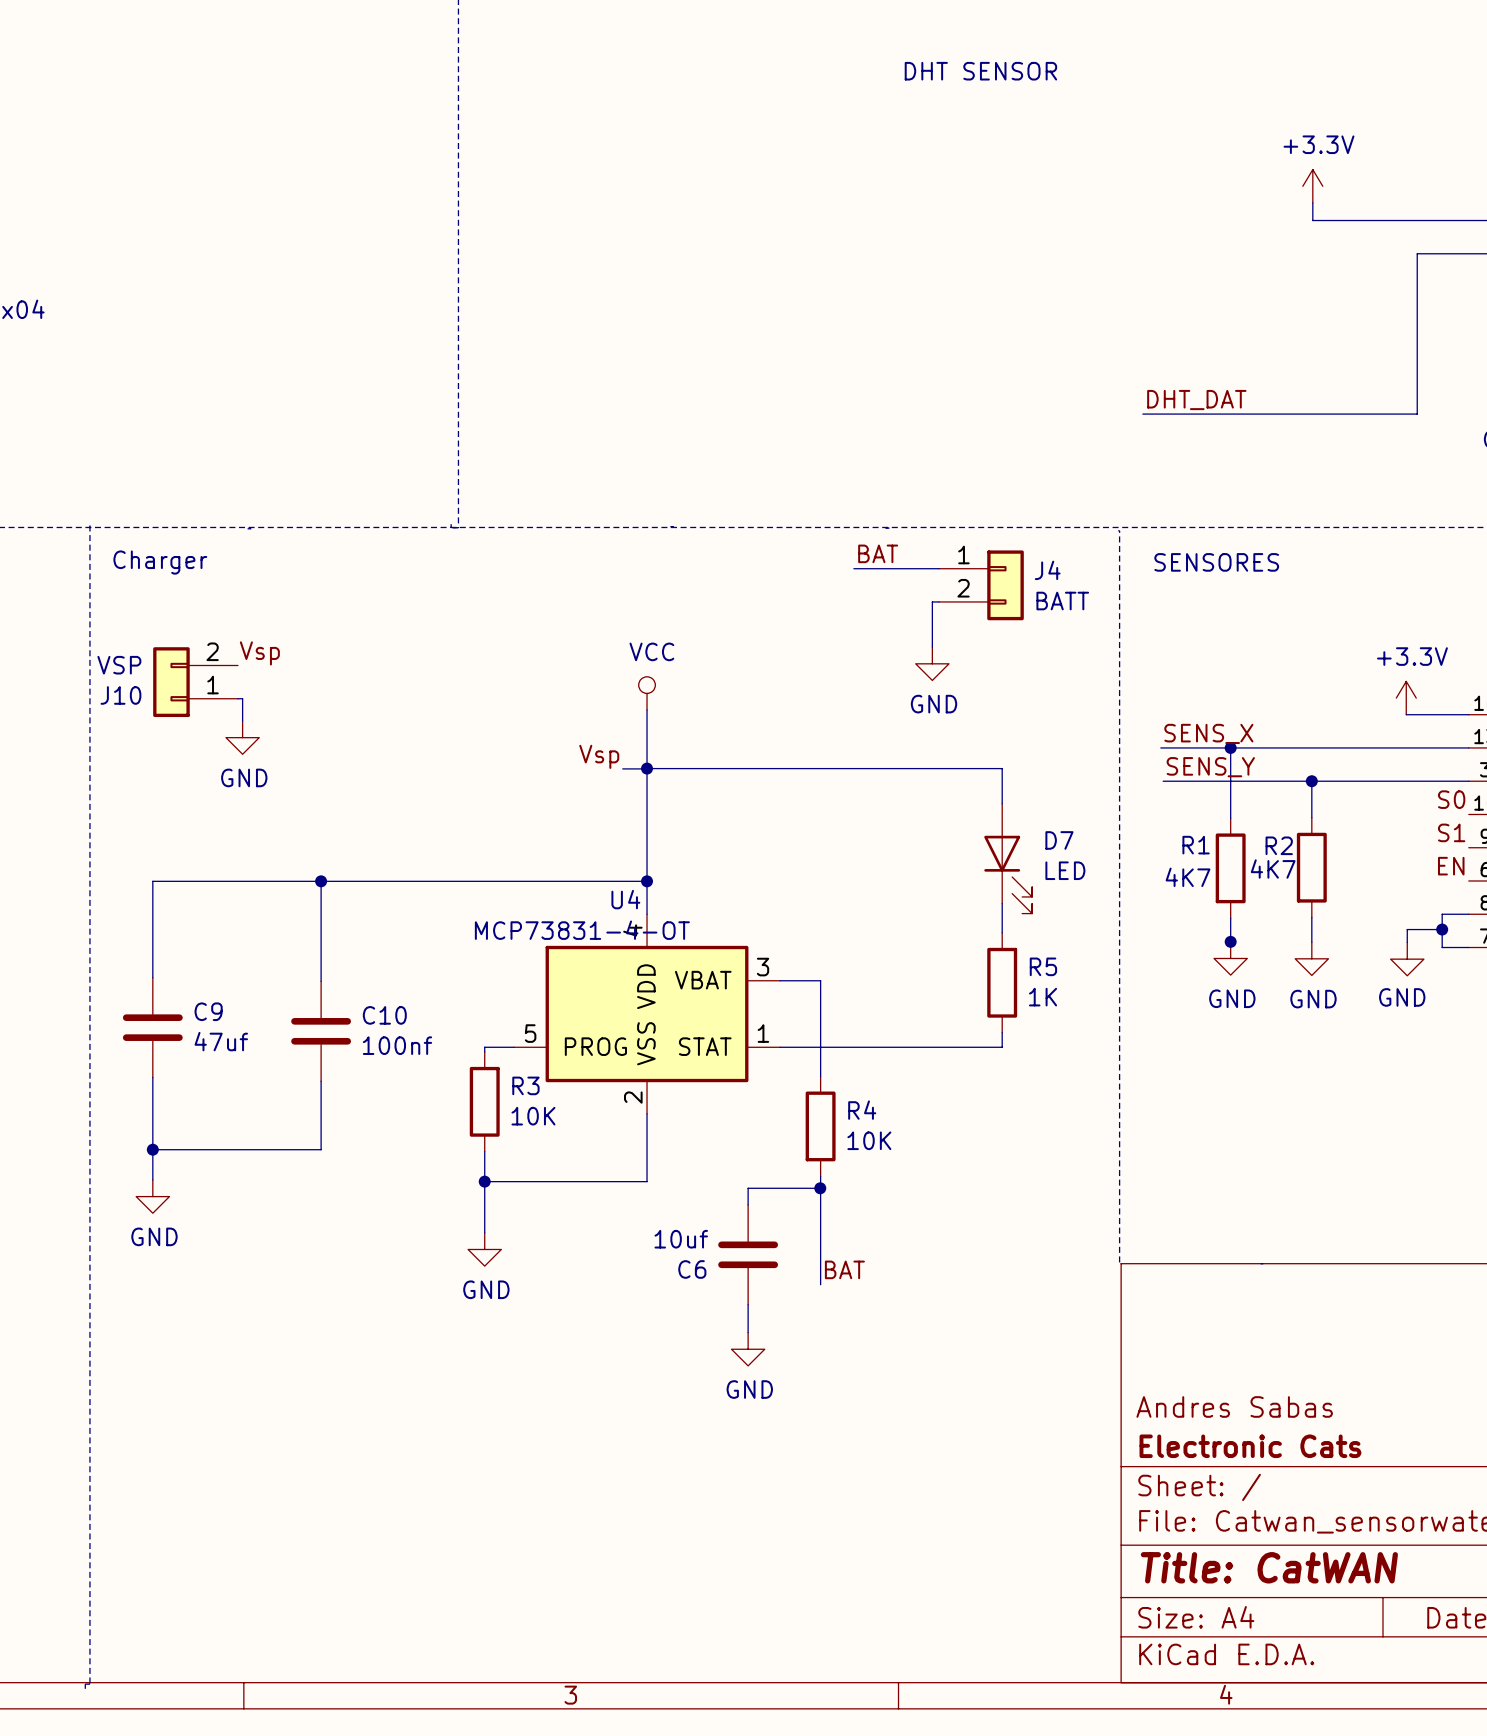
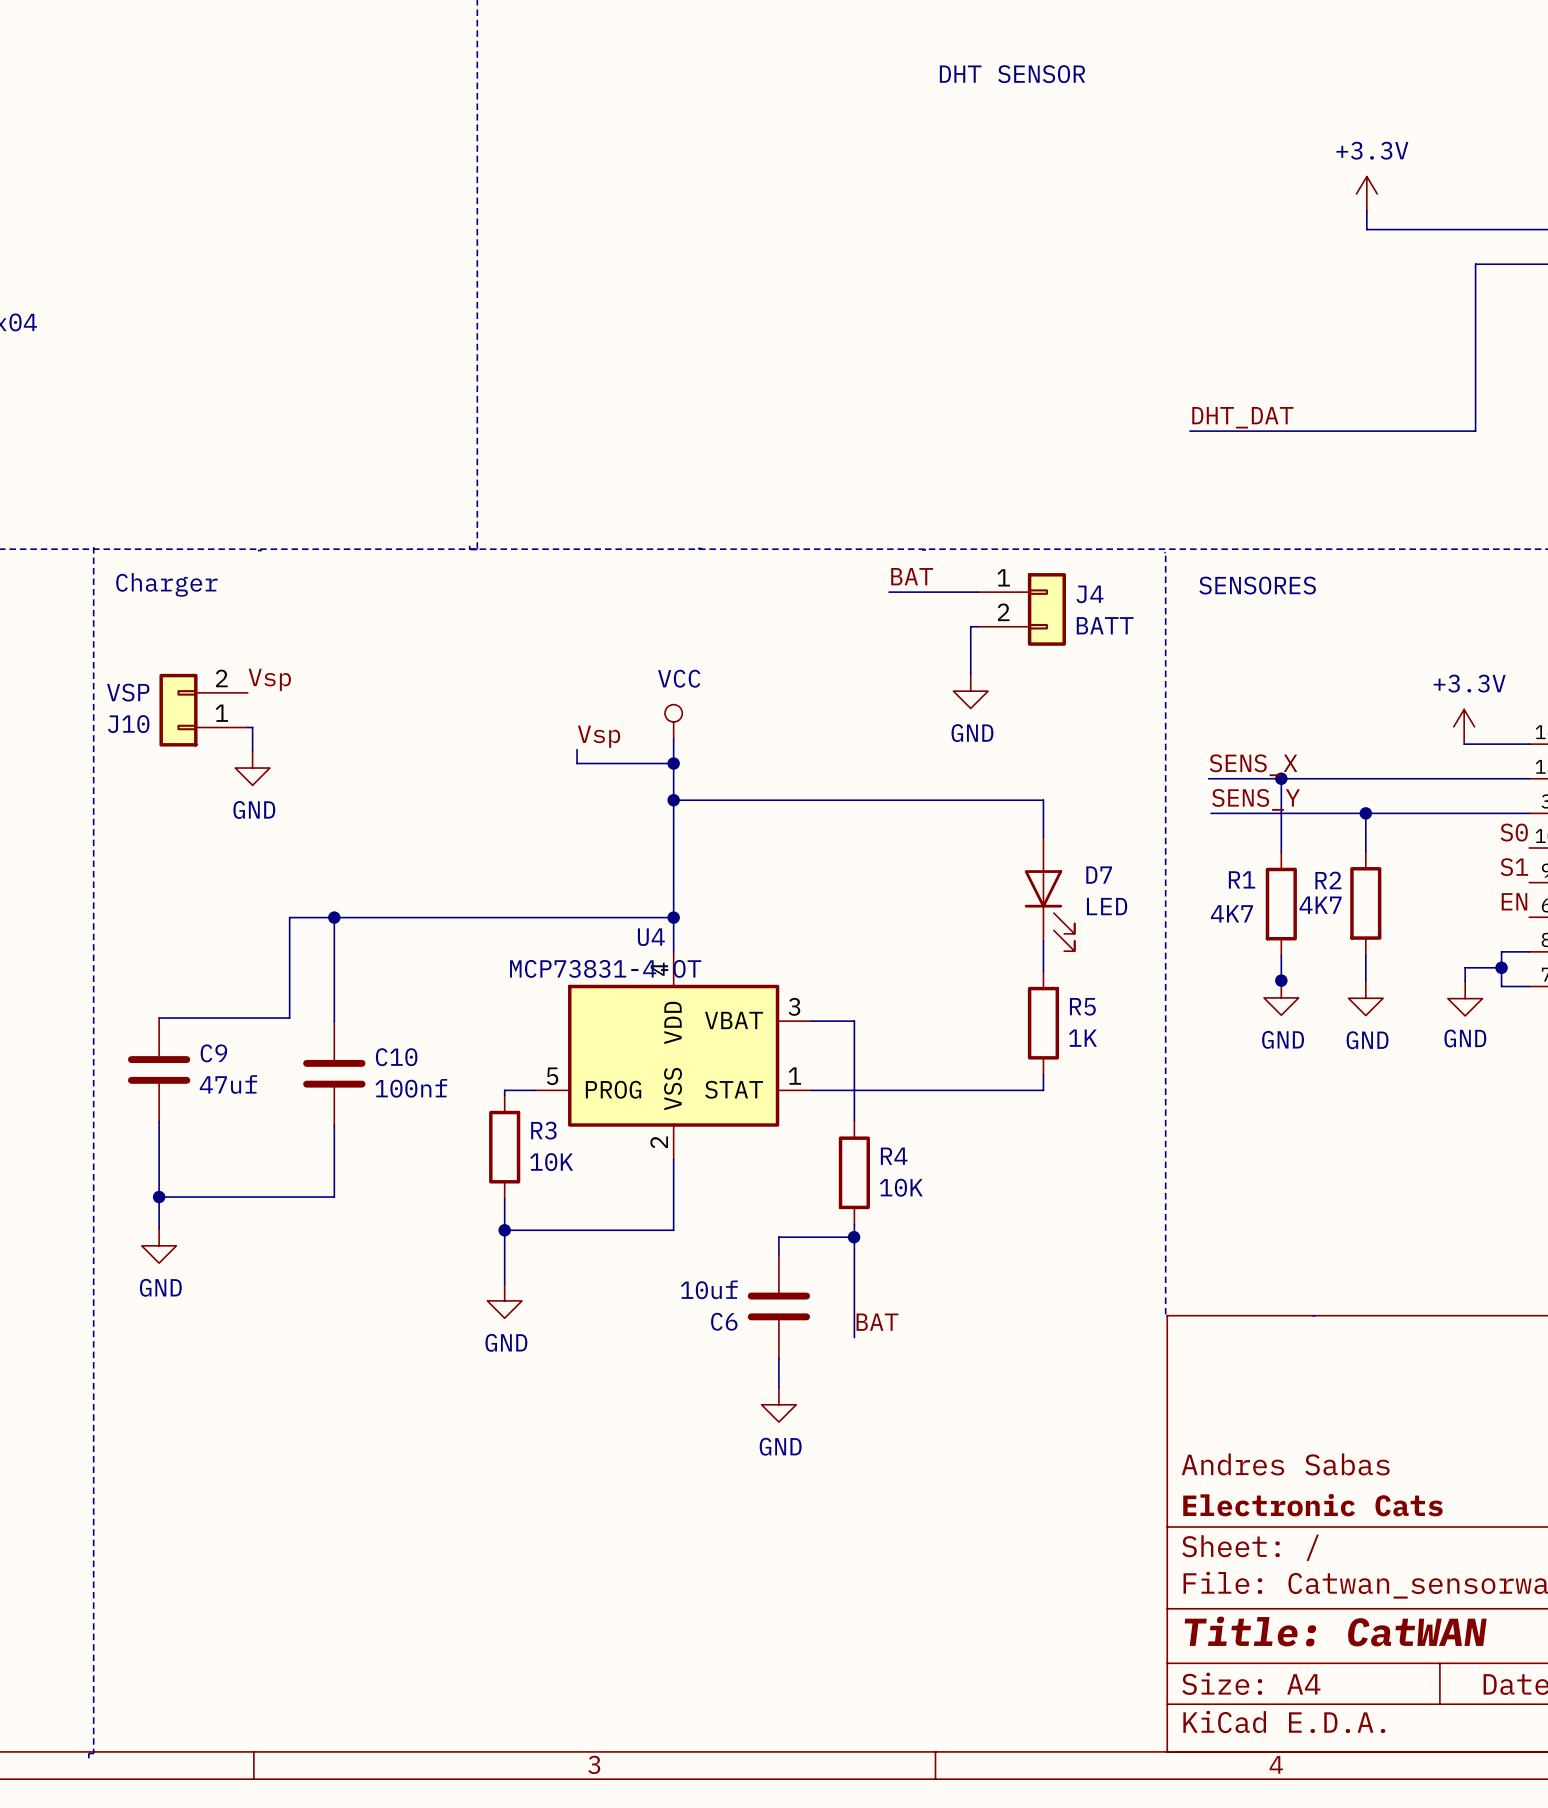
wire: none -> (577, 749) (577, 763) (673, 763)
junction: none -> (673, 763)
label position: Vsp (599, 756) -> Vsp (599, 736)
wire: (622, 768) (647, 768) -> none
wire: (278, 881) (152, 881) (152, 977) -> (289, 917) (289, 1018) (159, 1018)

